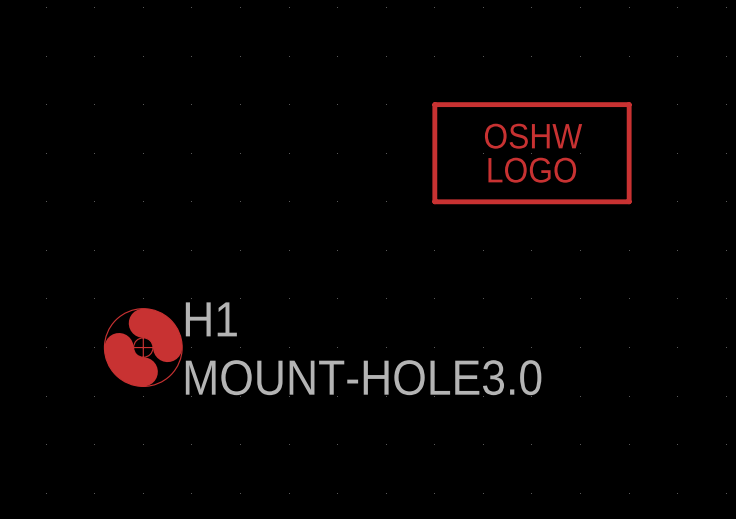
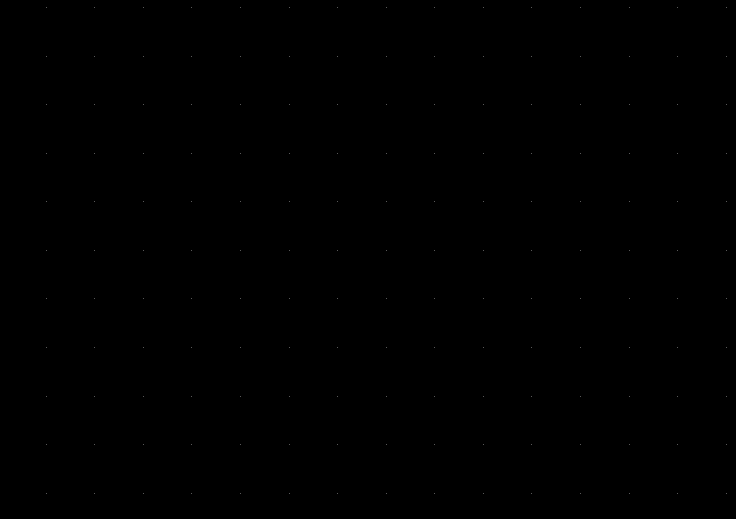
part: (531, 153) -> none
H1: MOUNT-HOLE3.0 (143, 347) -> none

